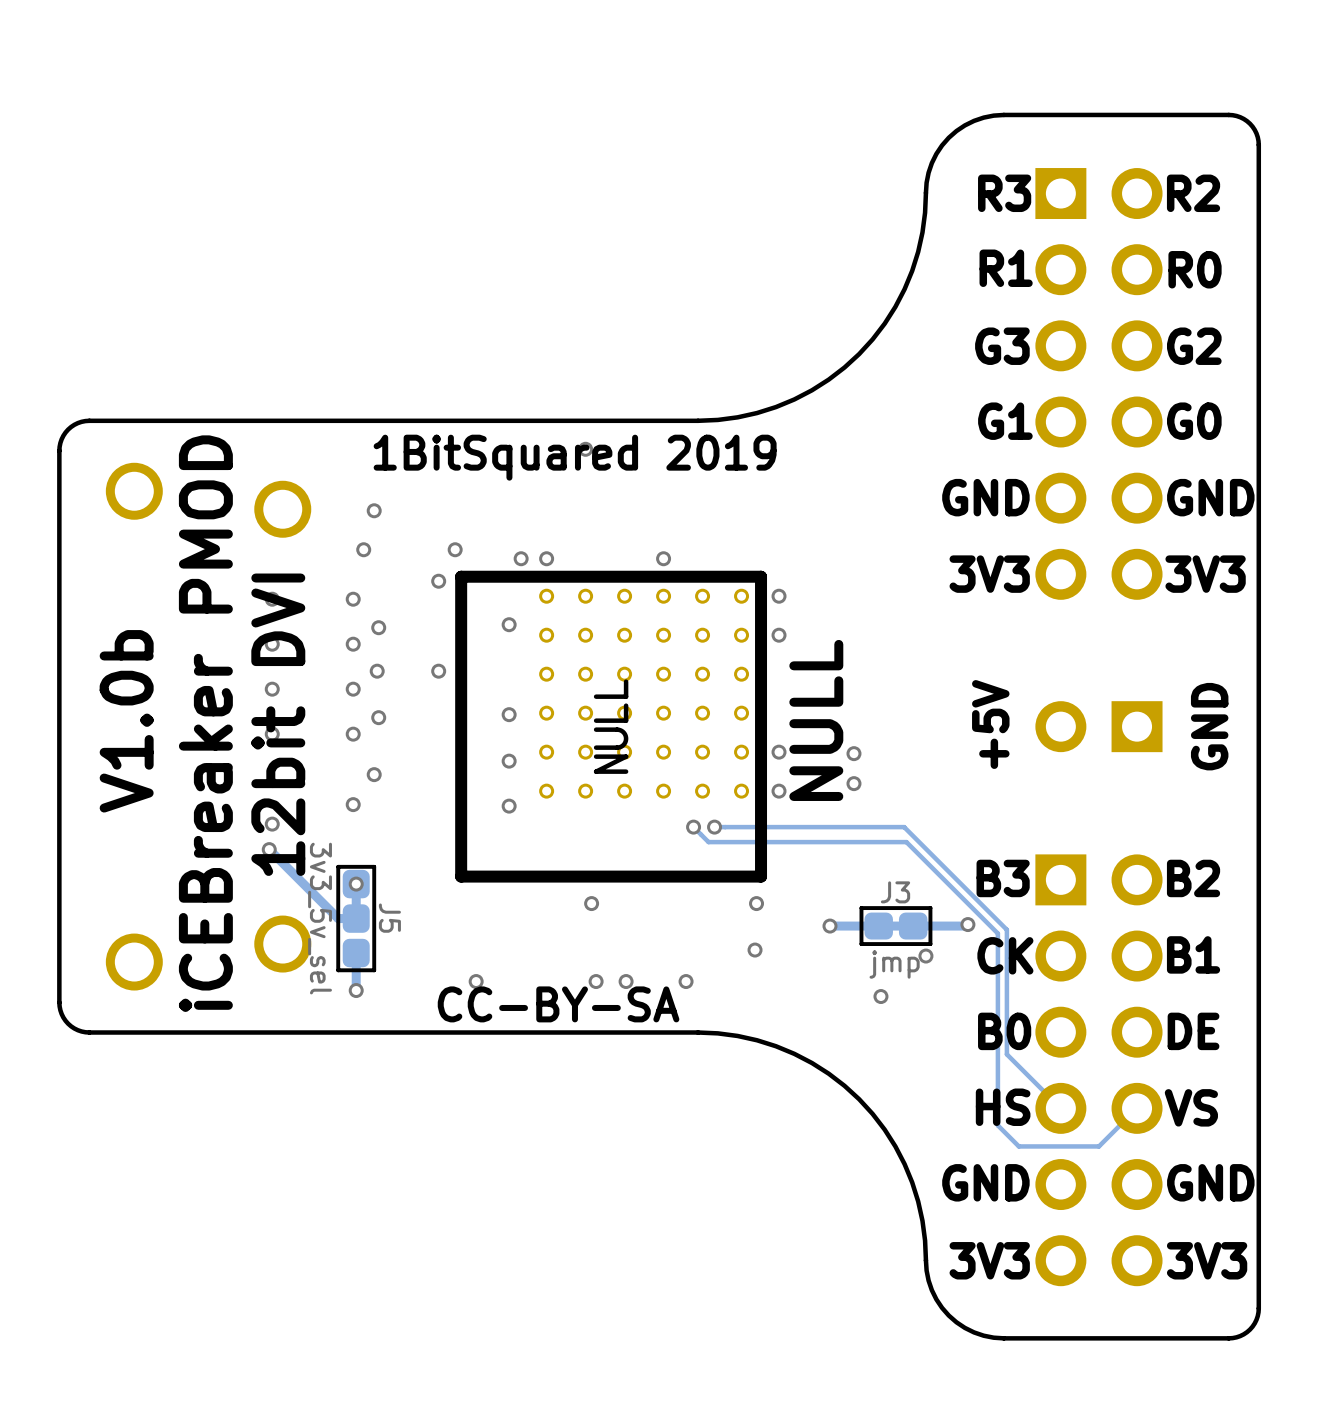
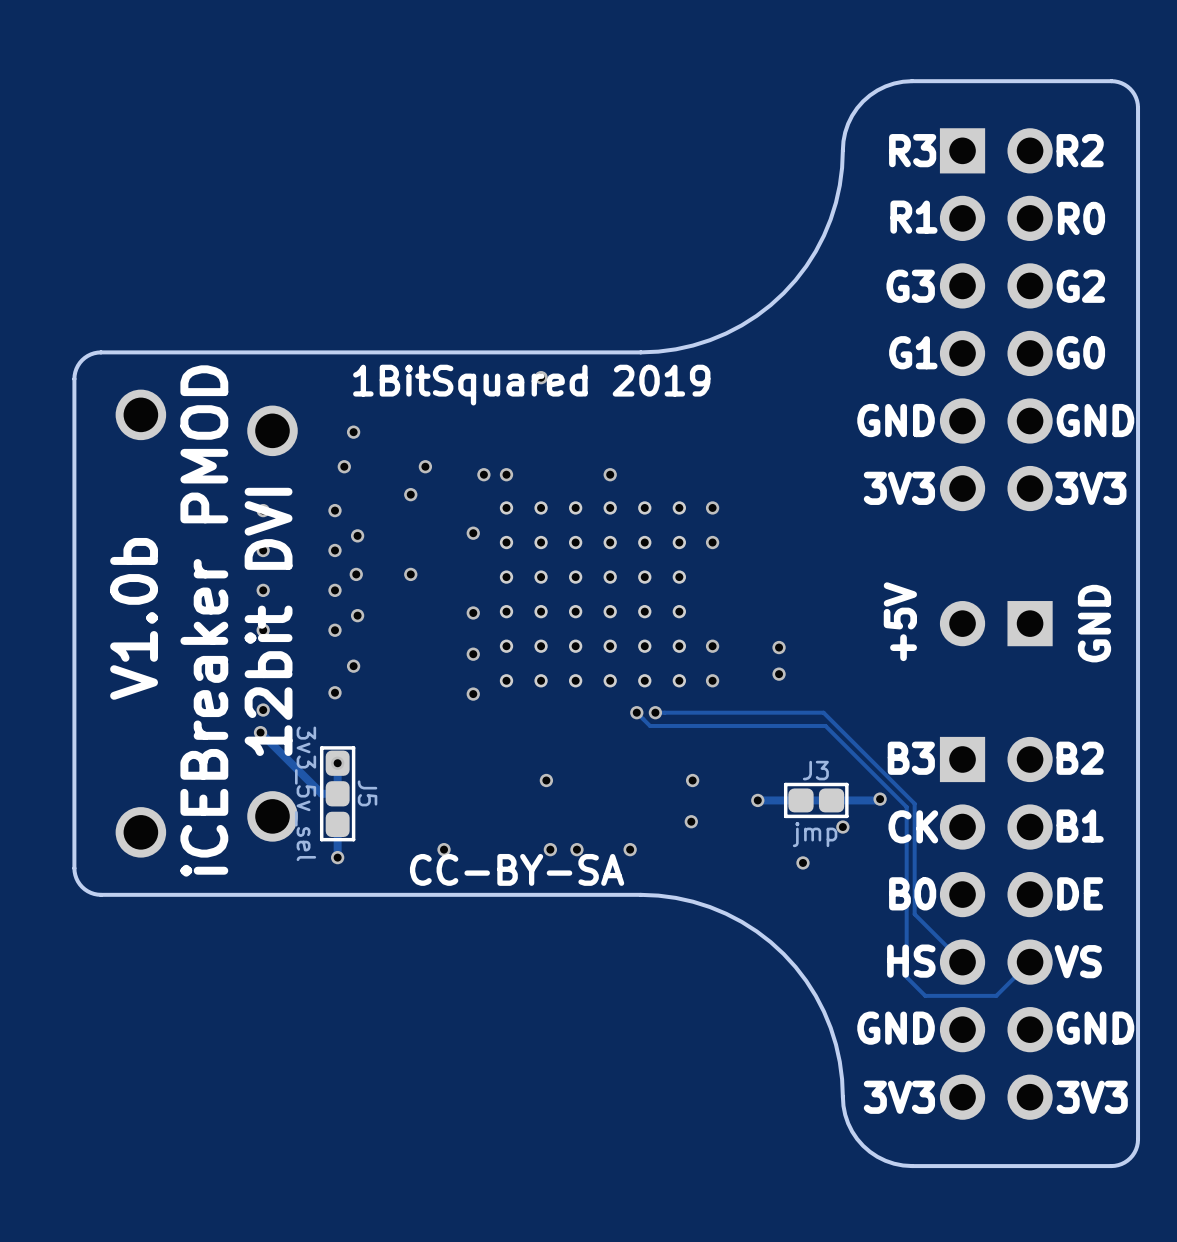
drawing: [455, 570, 768, 883] -> none
text: NULL (816, 720) -> none

